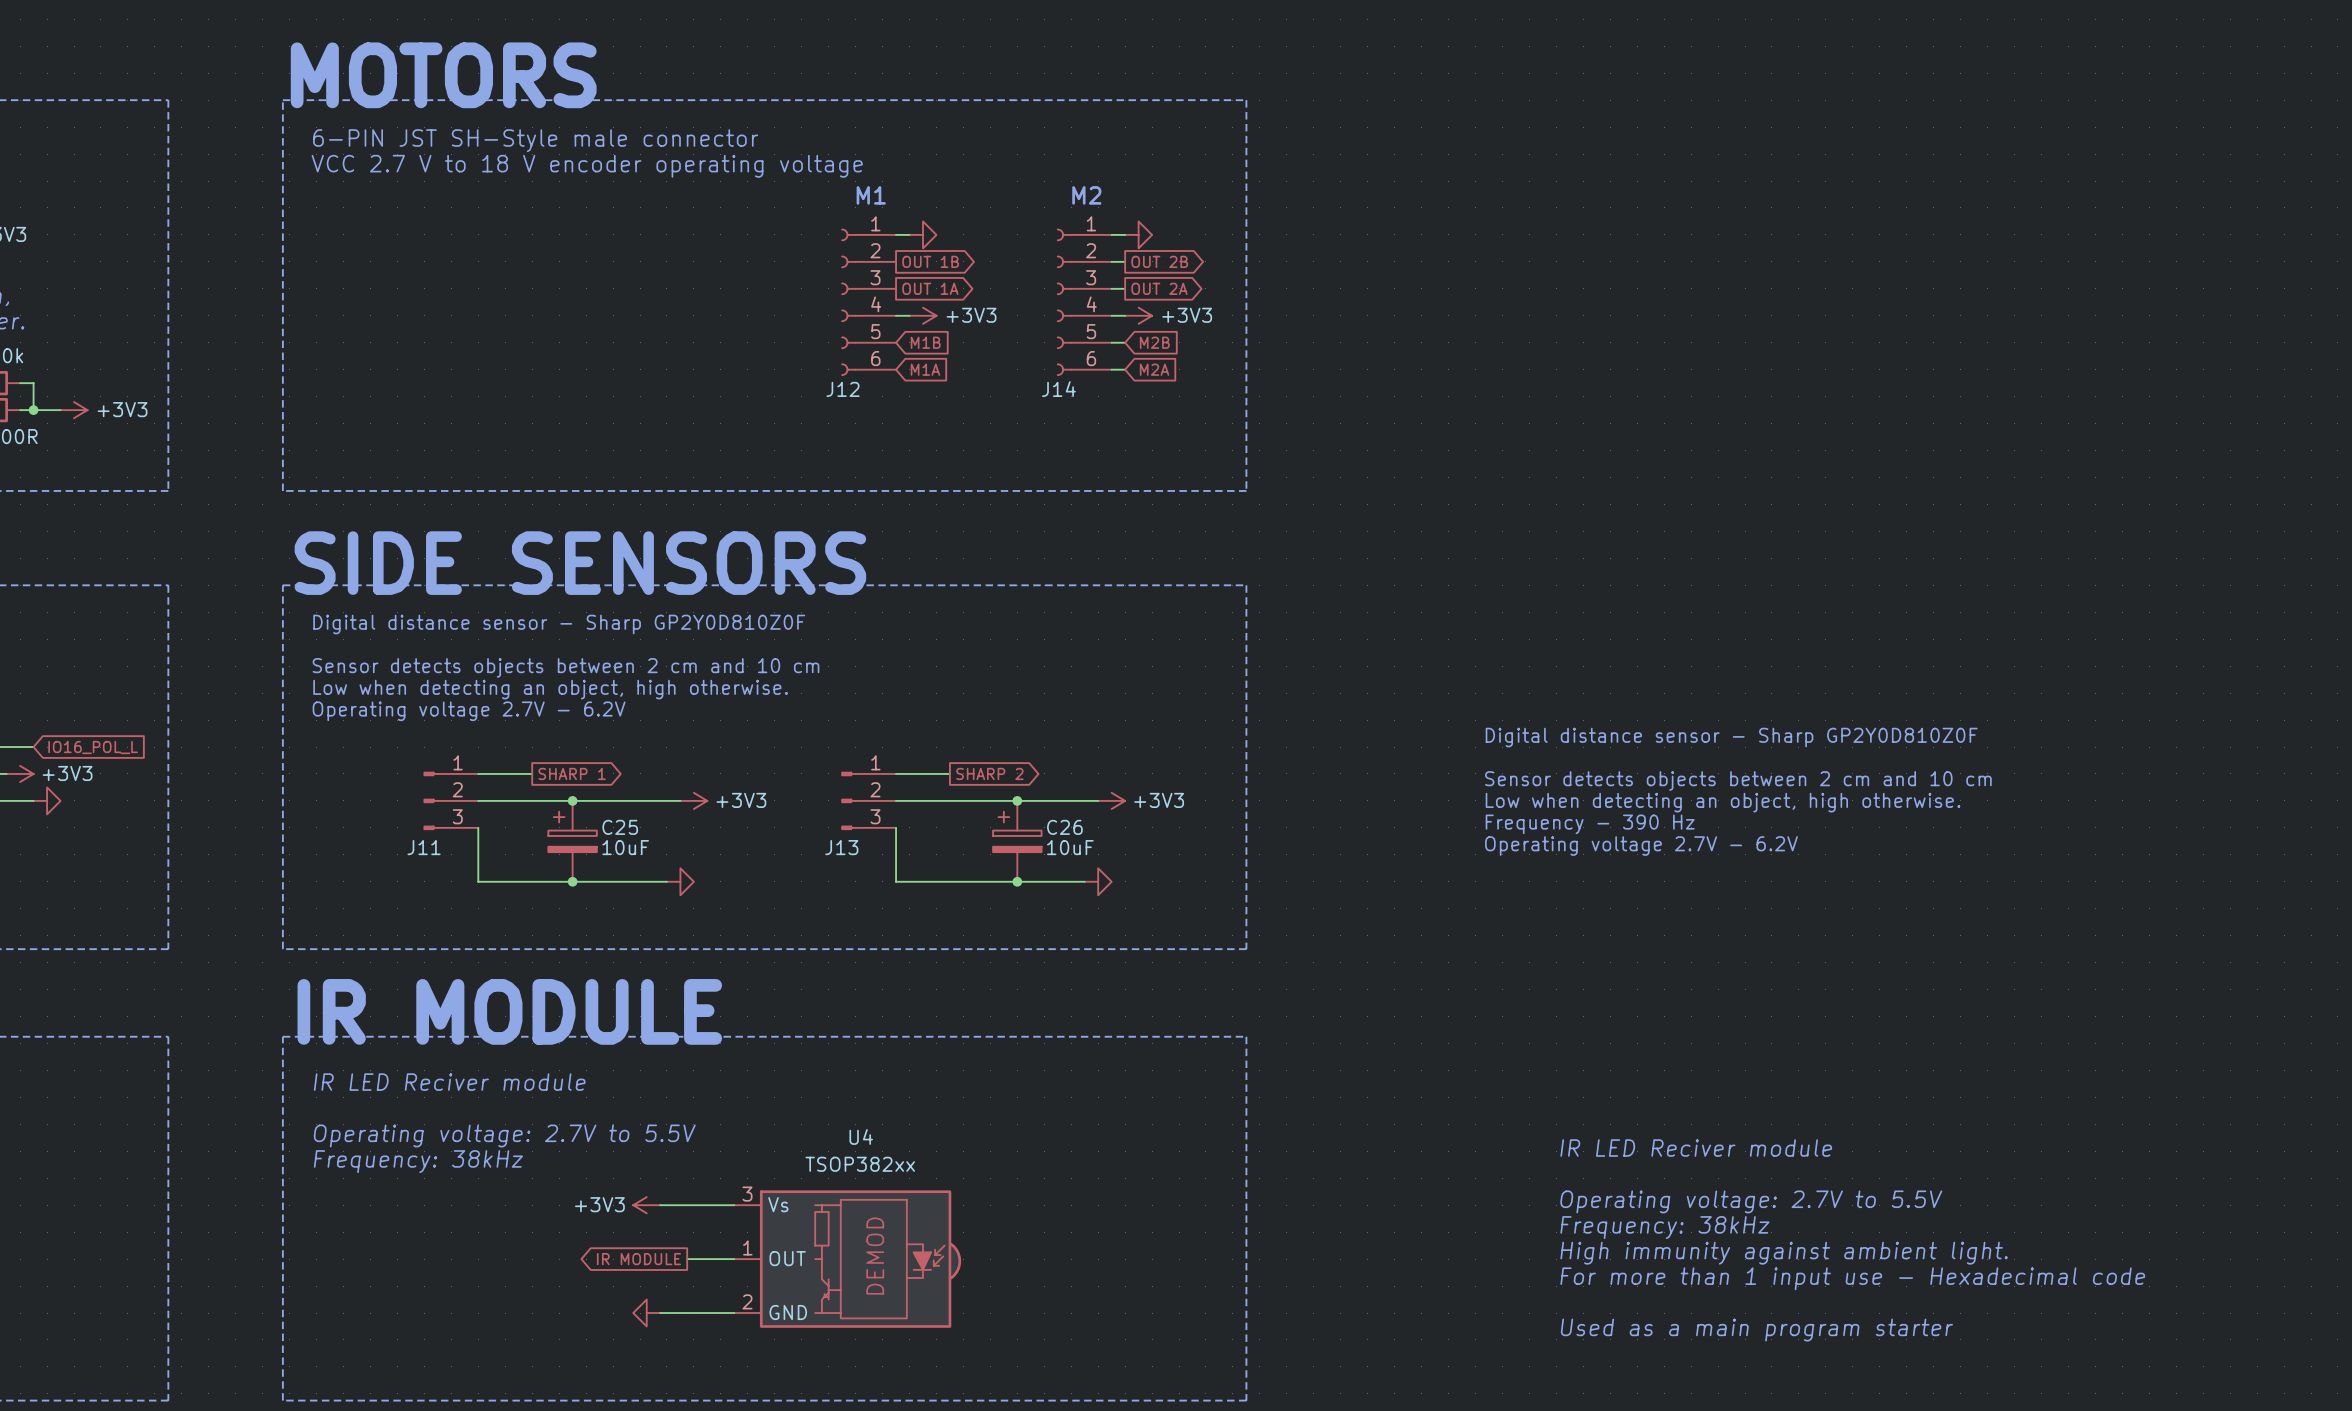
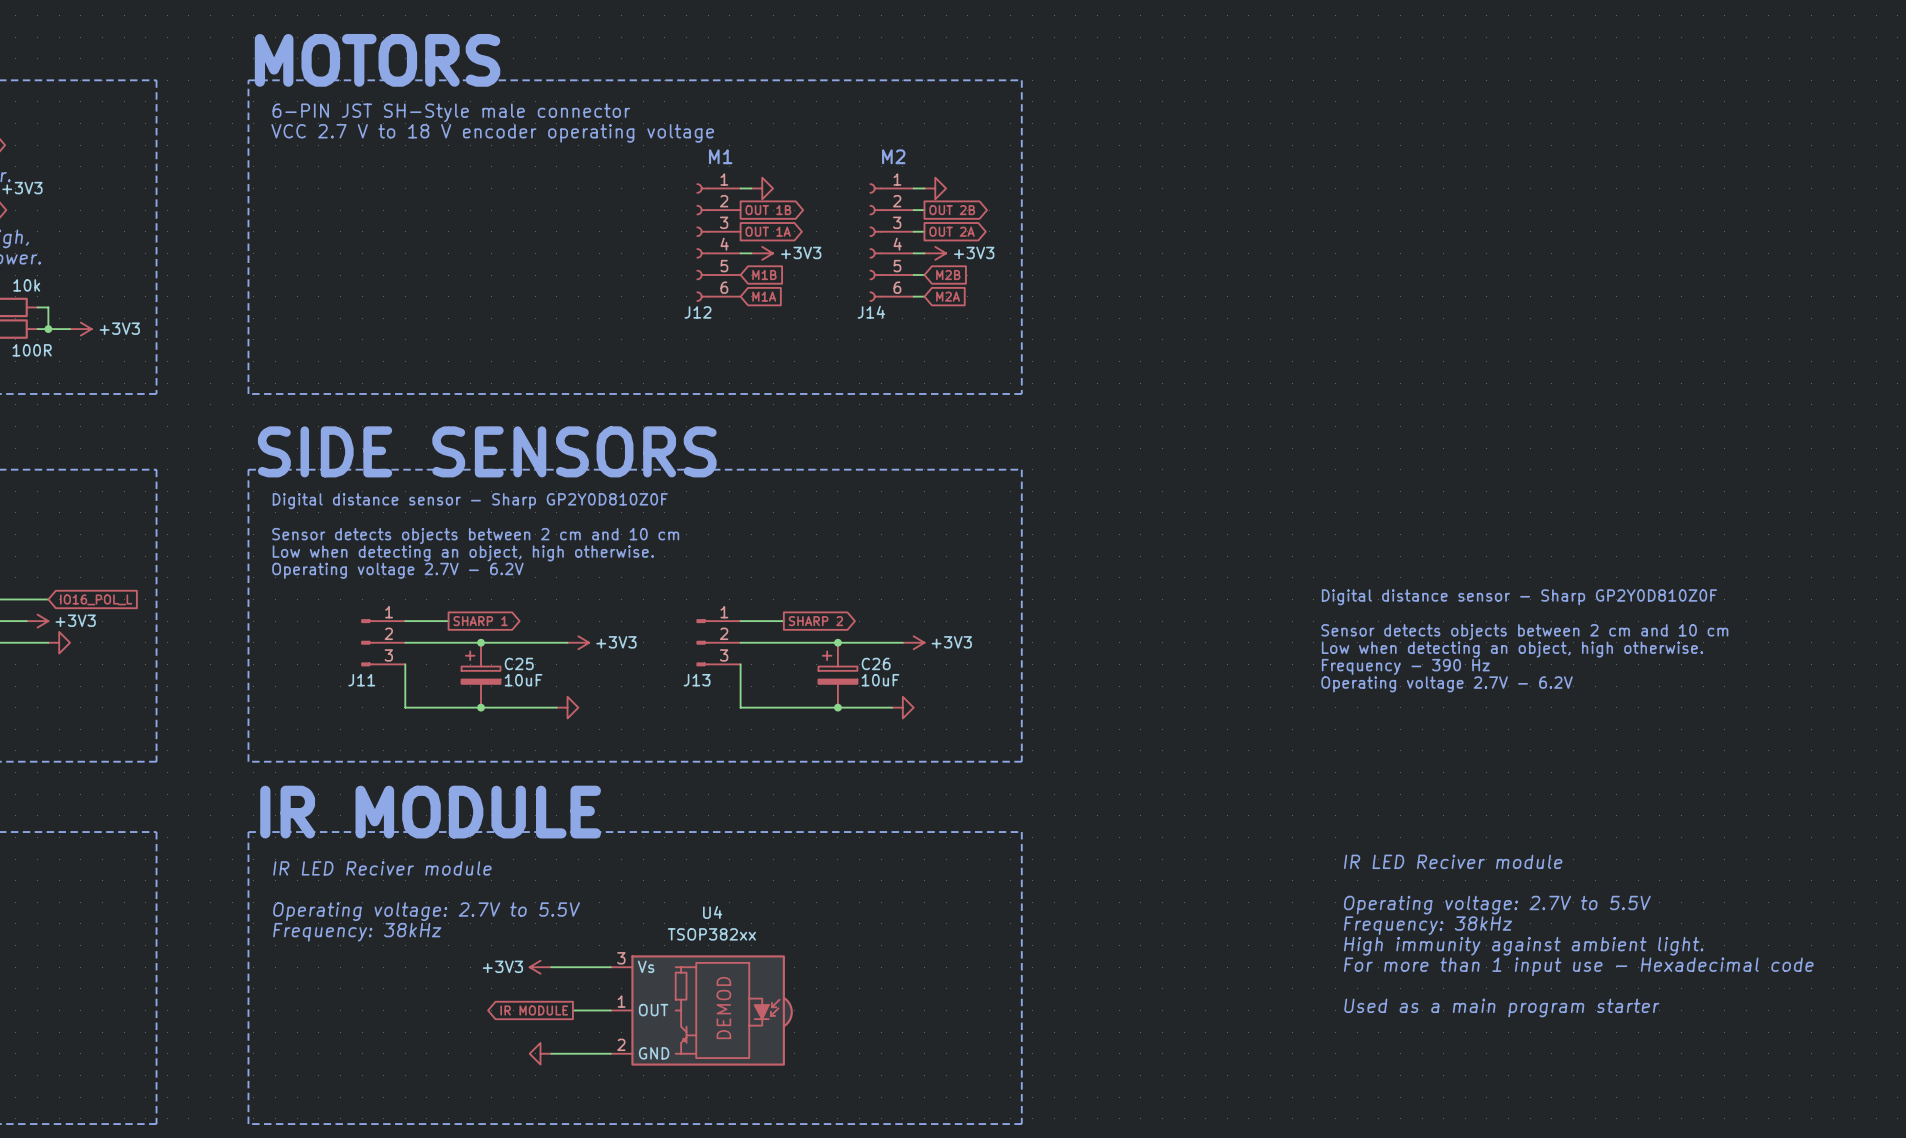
text position: Digital distance sensor - Sharp GP2Y0D810Z0F (1731, 737) -> Digital distance sensor - Sharp GP2Y0D810Z0F (1519, 597)
text position: Sensor detects objects between 2 cm and 10 cm (1738, 780) -> Sensor detects objects between 2 cm and 10 cm (1524, 632)
text position: Low when detecting an object, high otherwise. (1722, 802) -> Low when detecting an object, high otherwise. (1512, 649)
text position: Frequency - 390 Hz (1590, 824) -> Frequency - 390 Hz (1405, 666)
text position: Operating voltage 2.7V - 6.2V (1641, 846) -> Operating voltage 2.7V - 6.2V (1447, 684)
text position: IR LED Reciver module (1696, 1148) -> IR LED Reciver module (1453, 861)
text position: Operating voltage: 2.7V to 5.5V (1751, 1201) -> Operating voltage: 2.7V to 5.5V (1497, 905)
text position: Frequency: 38kHz (1664, 1227) -> Frequency: 38kHz (1428, 925)
text position: High immunity against ambient light. (1784, 1253) -> High immunity against ambient light. (1523, 946)
text position: For more than 1 input use - Hexadecimal code (1852, 1278) -> For more than 1 input use - Hexadecimal code (1578, 966)
text position: Used as a main program starter (1756, 1330) -> Used as a main program starter (1501, 1007)

